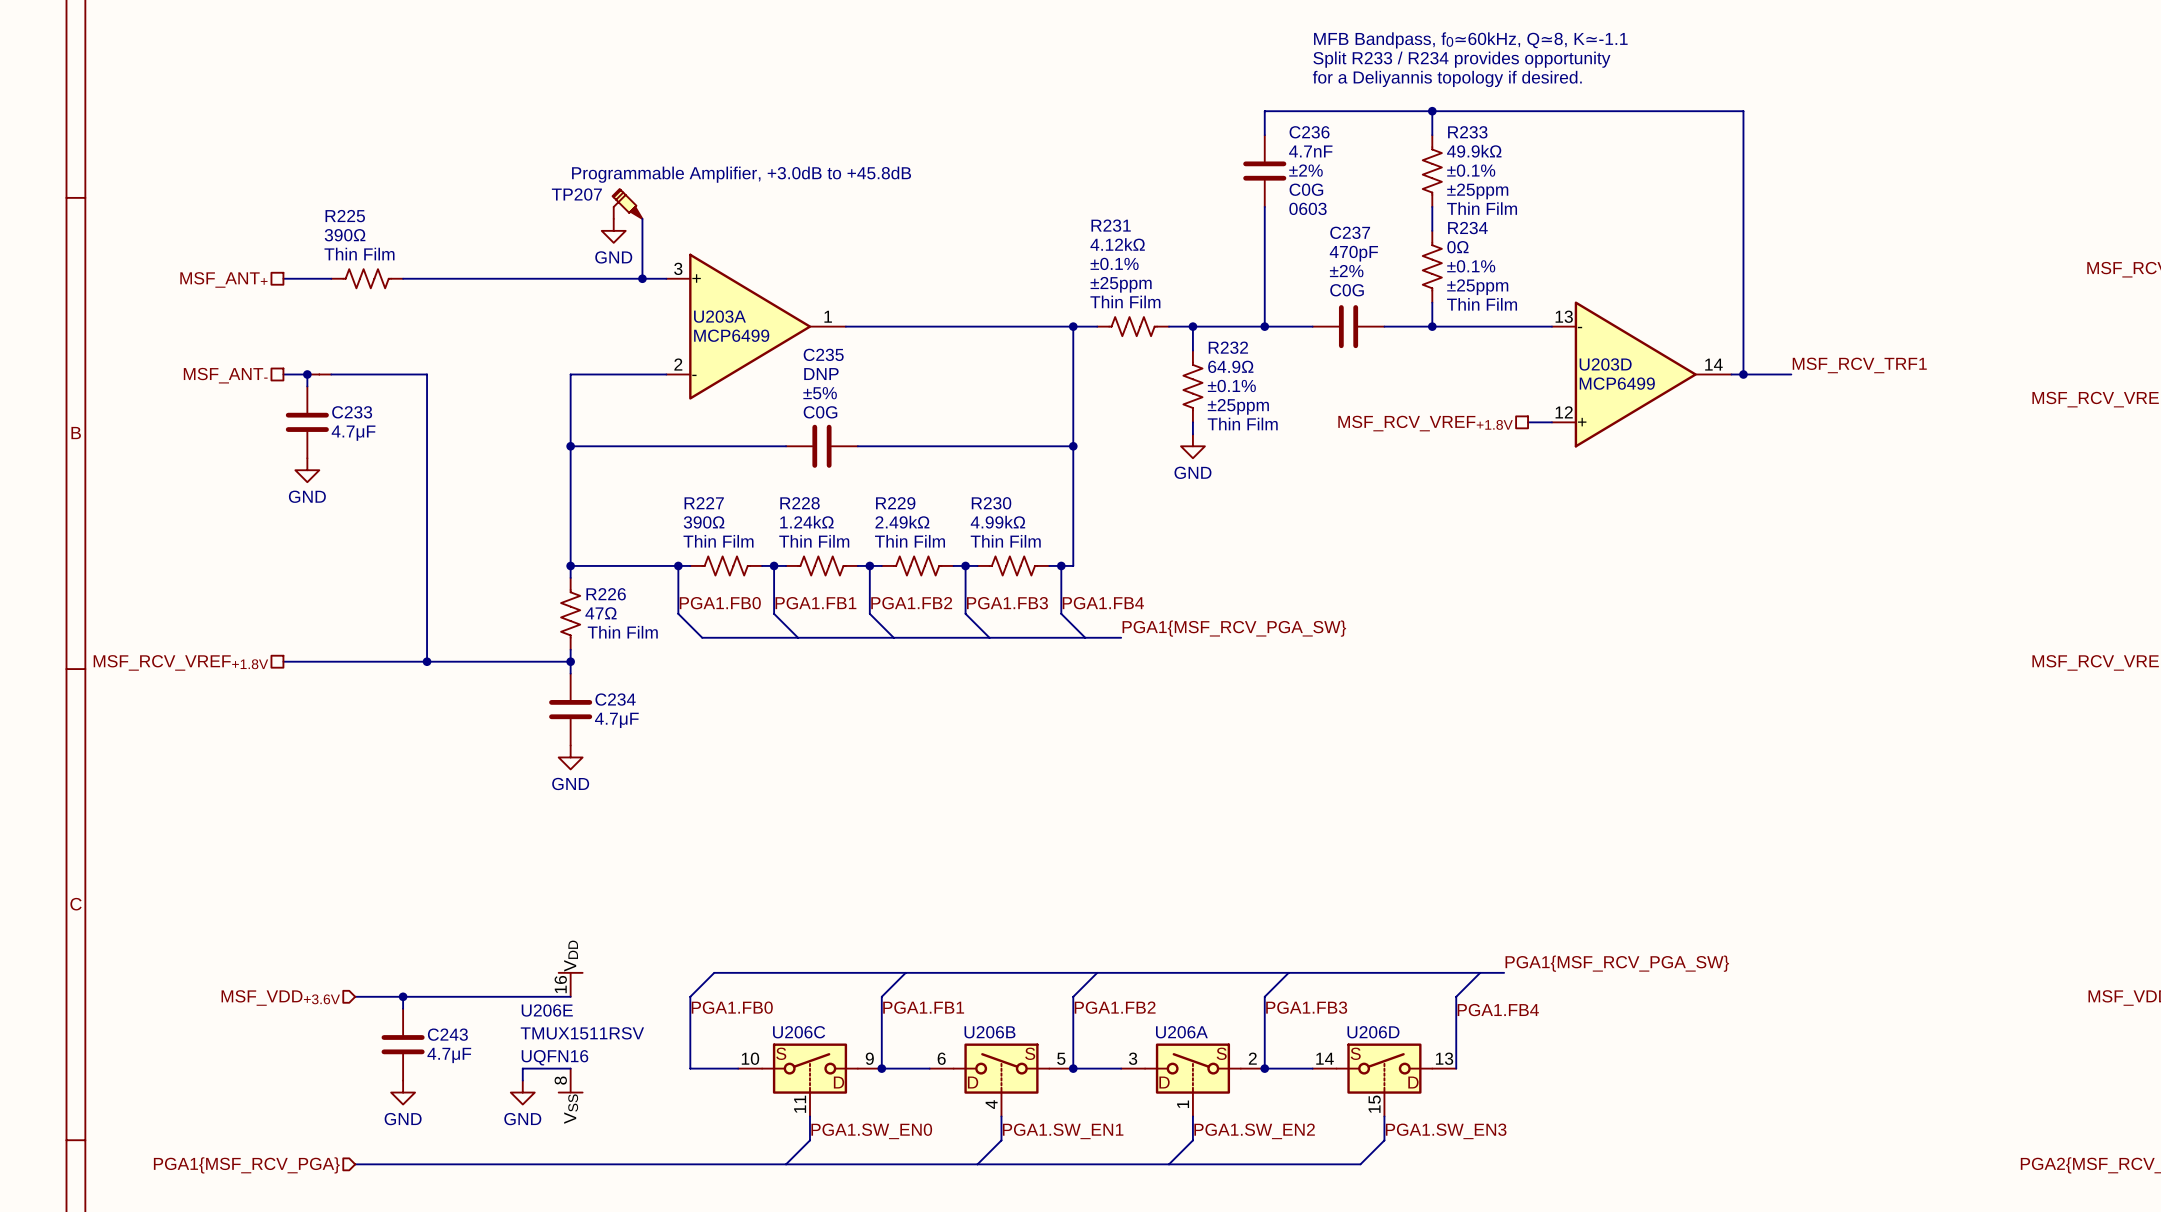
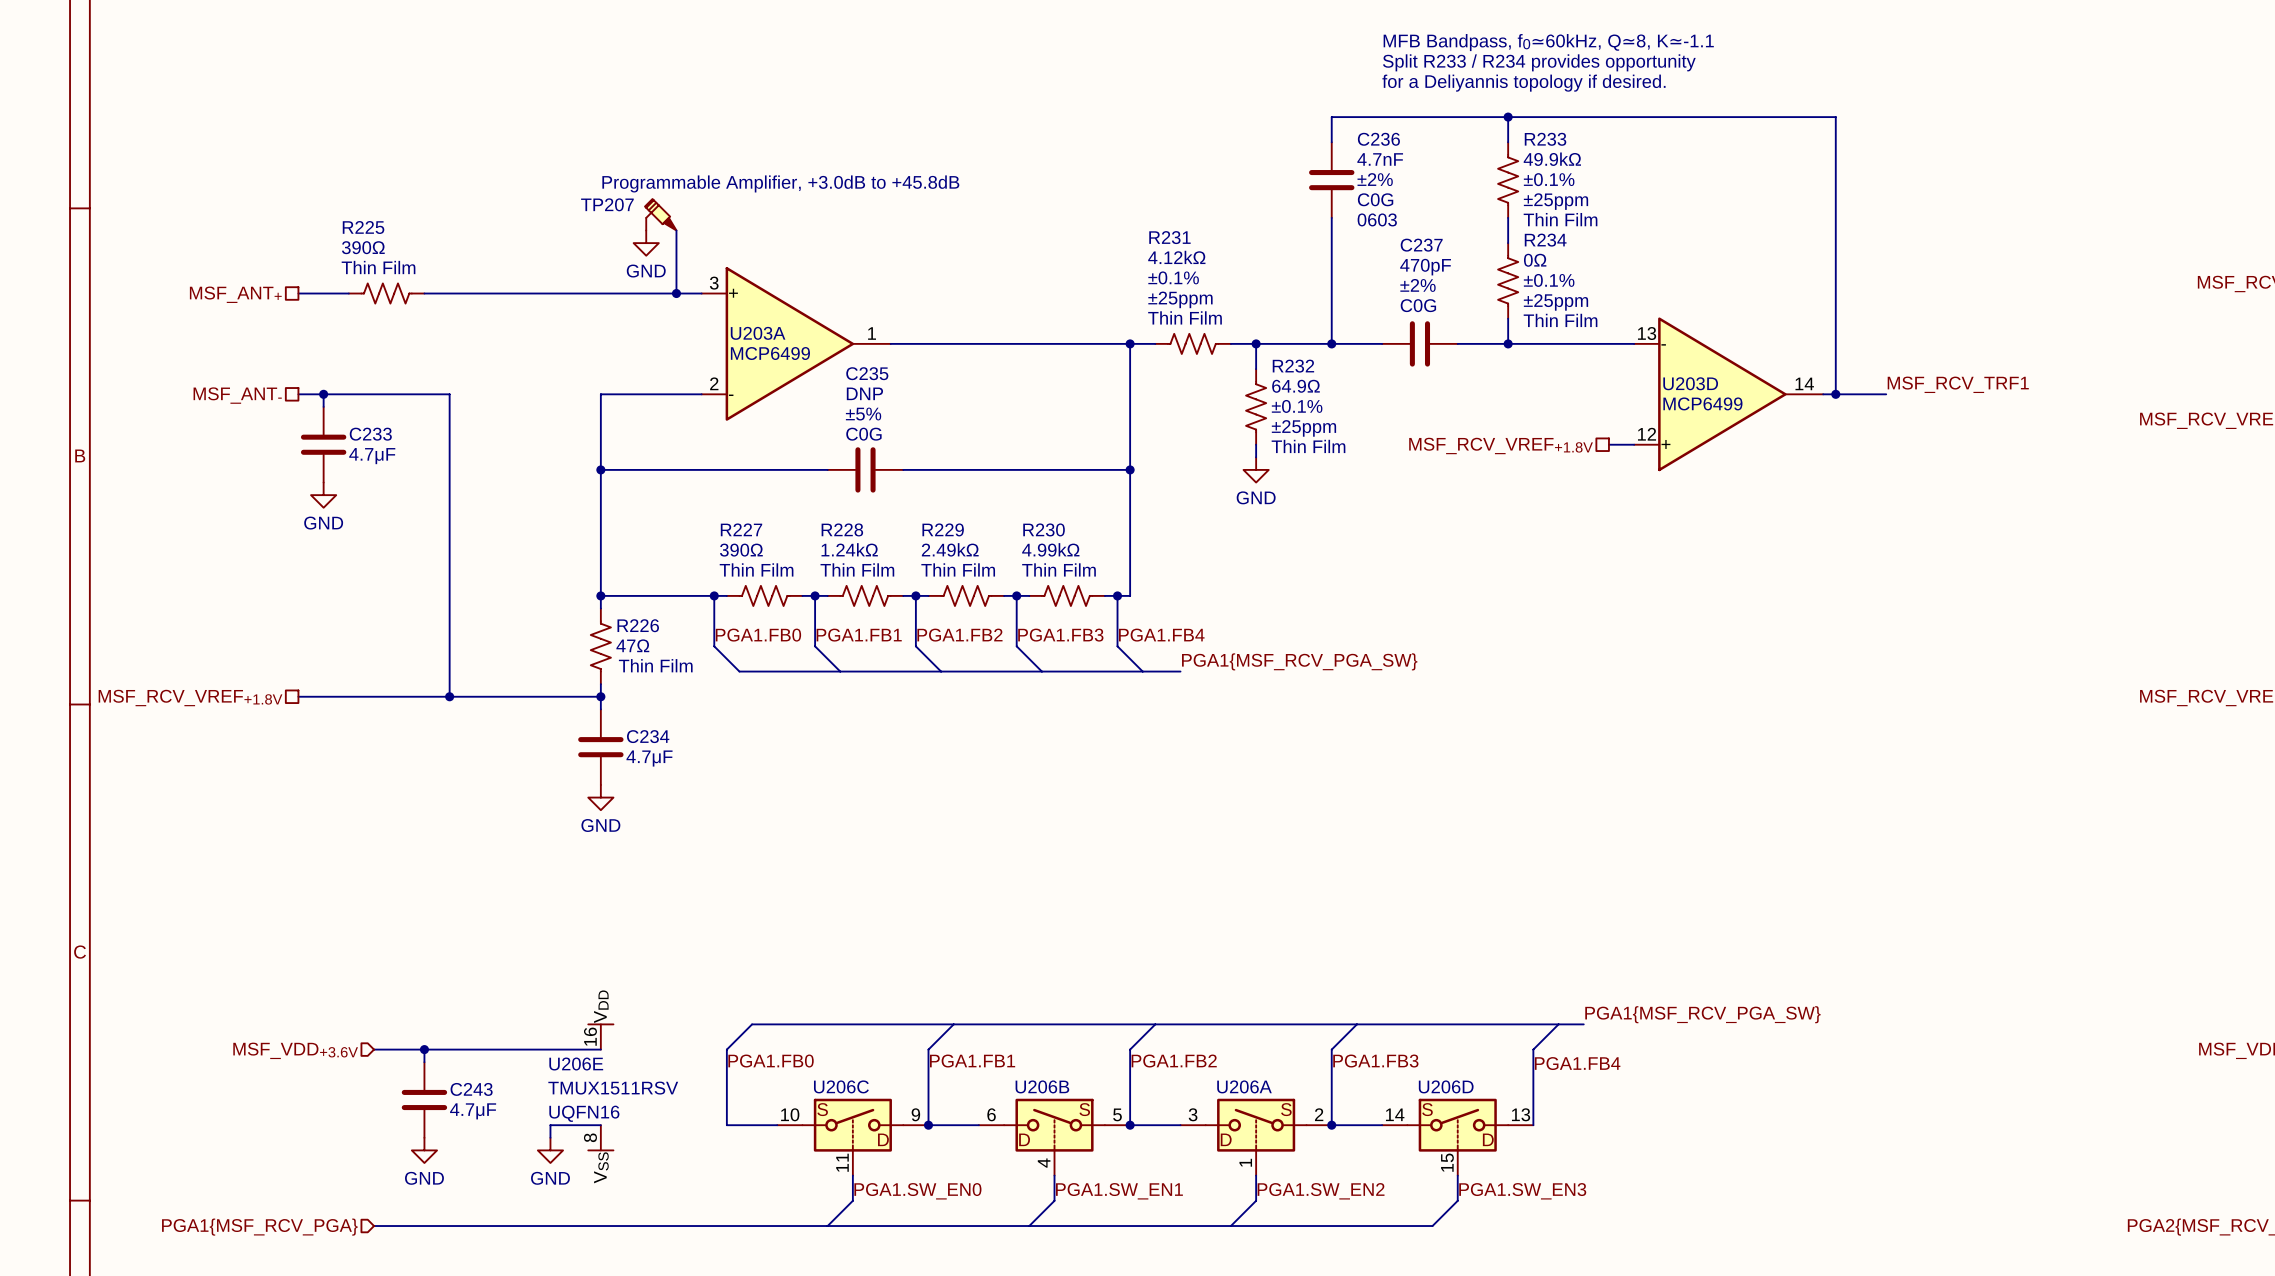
part: (319, 374) -> none

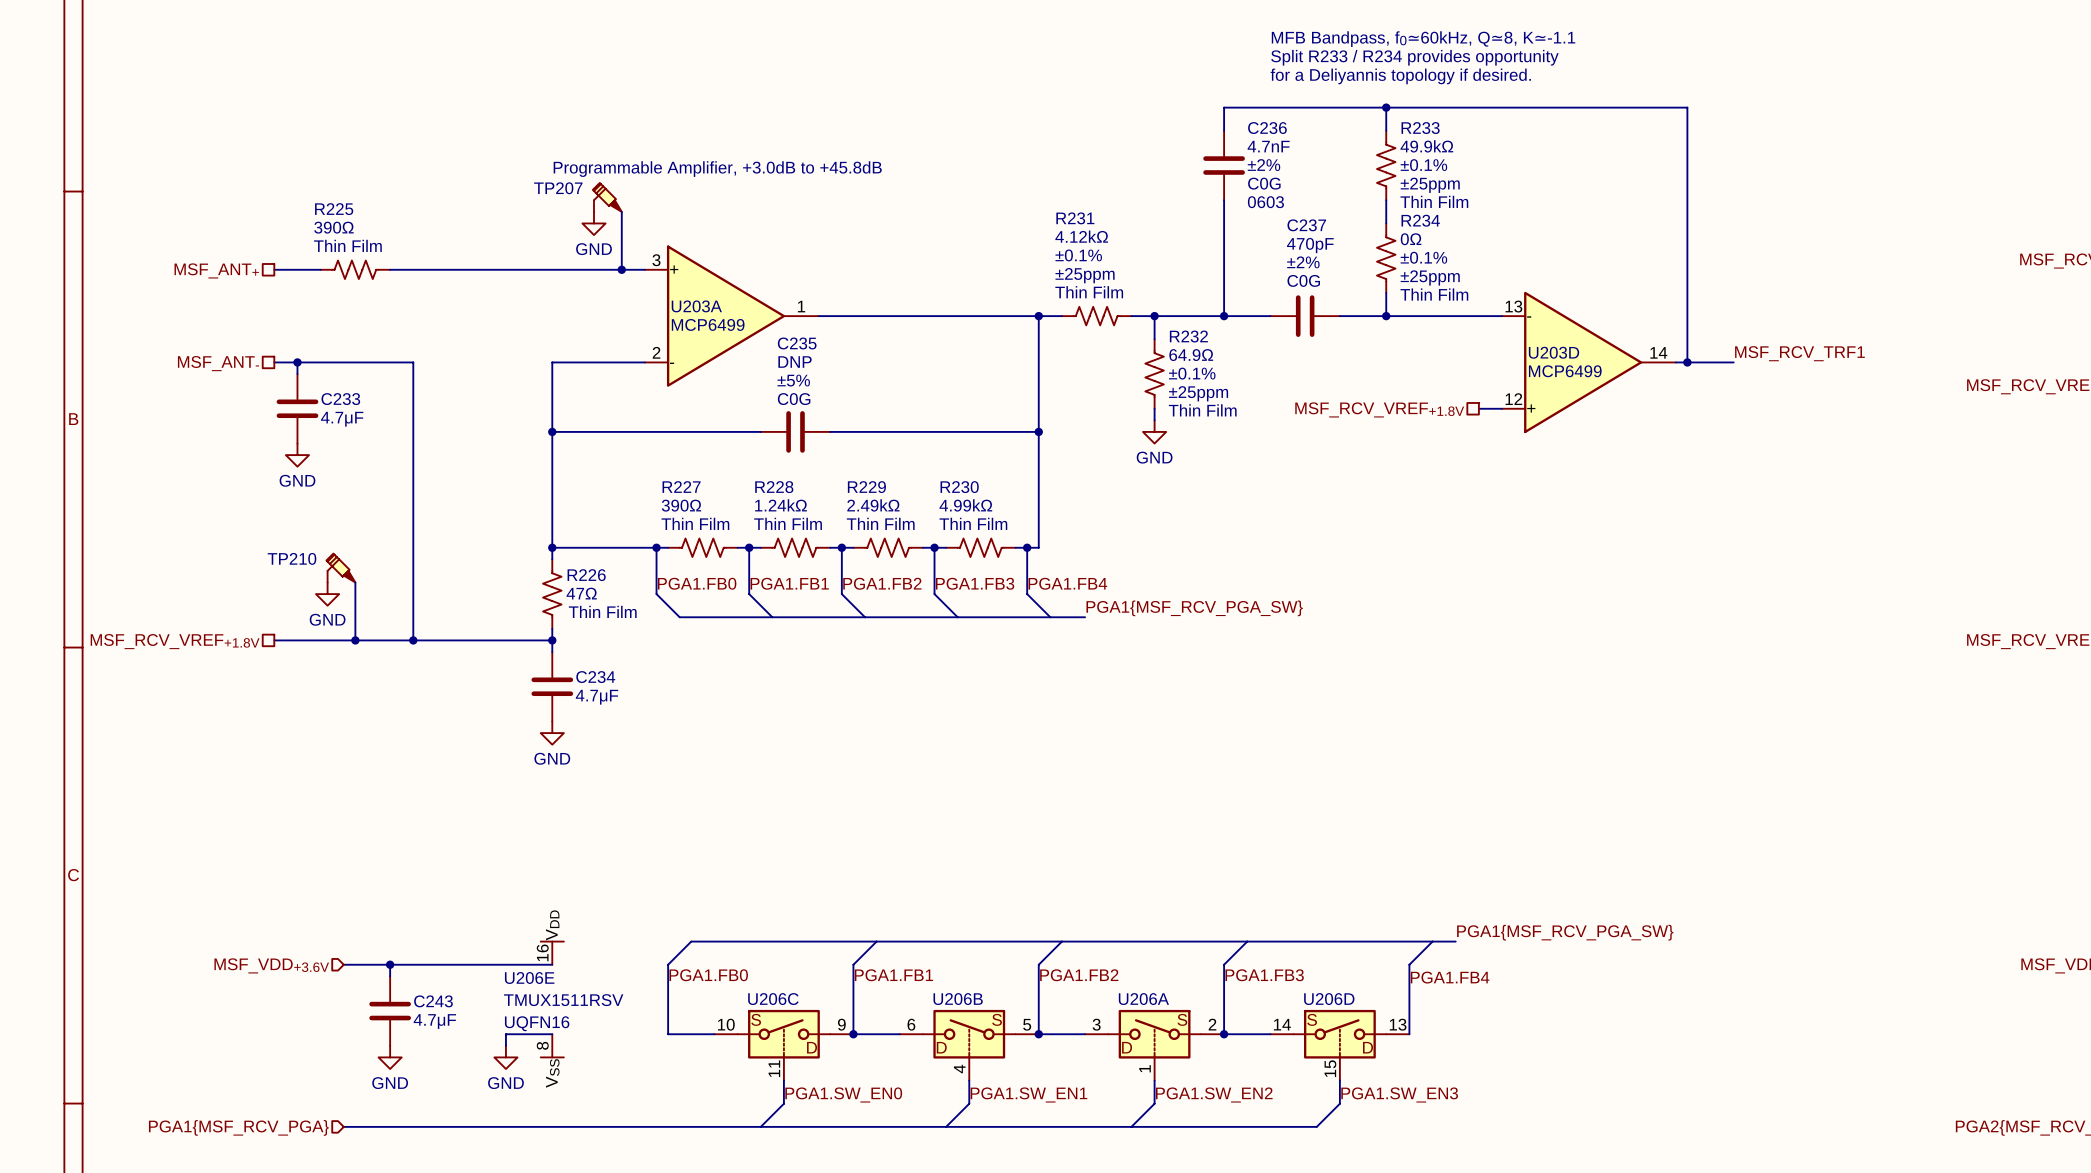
TP210: none -> (340, 568)
wire: none -> (355, 582) (355, 640)
power symbol: none -> GND (327, 594)
junction: none -> (355, 640)

